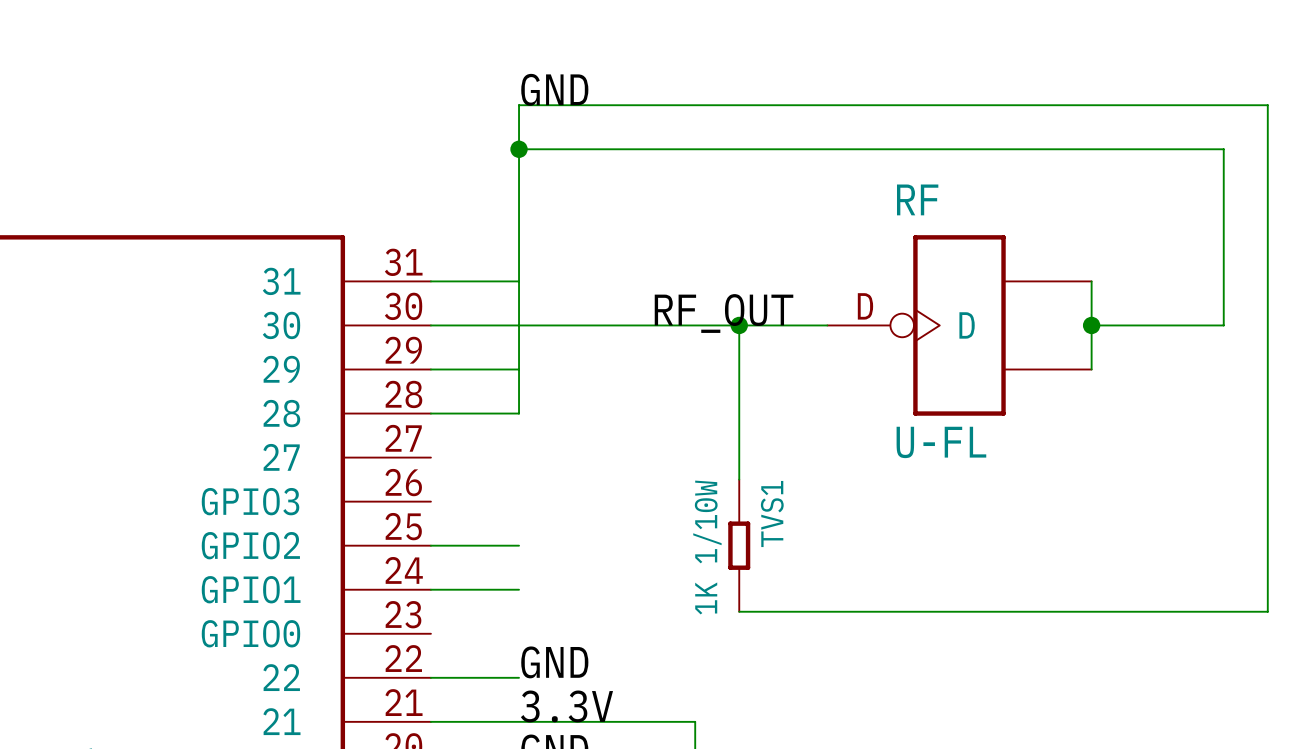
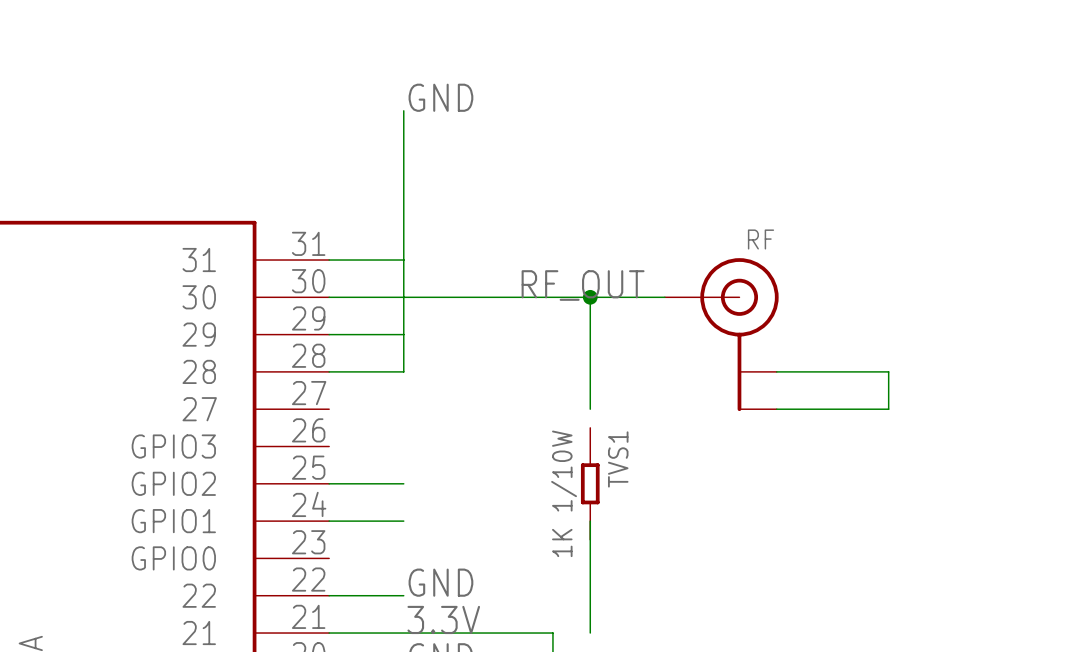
wire: (519, 105) (1267, 105) (1267, 611) (739, 611) -> none
wire: (519, 149) (1223, 149) (1223, 325) (1091, 325) -> none
junction: (519, 149) -> none
wire: (1091, 281) (1091, 369) -> none
RF: U-FL (959, 325) -> none
junction: (1091, 325) -> none
RF: none -> (721, 334)
wire: none -> (776, 371) (888, 371) (888, 409) (776, 409)
wire: (739, 457) (739, 479) -> none
wire: none -> (590, 521) (590, 633)

